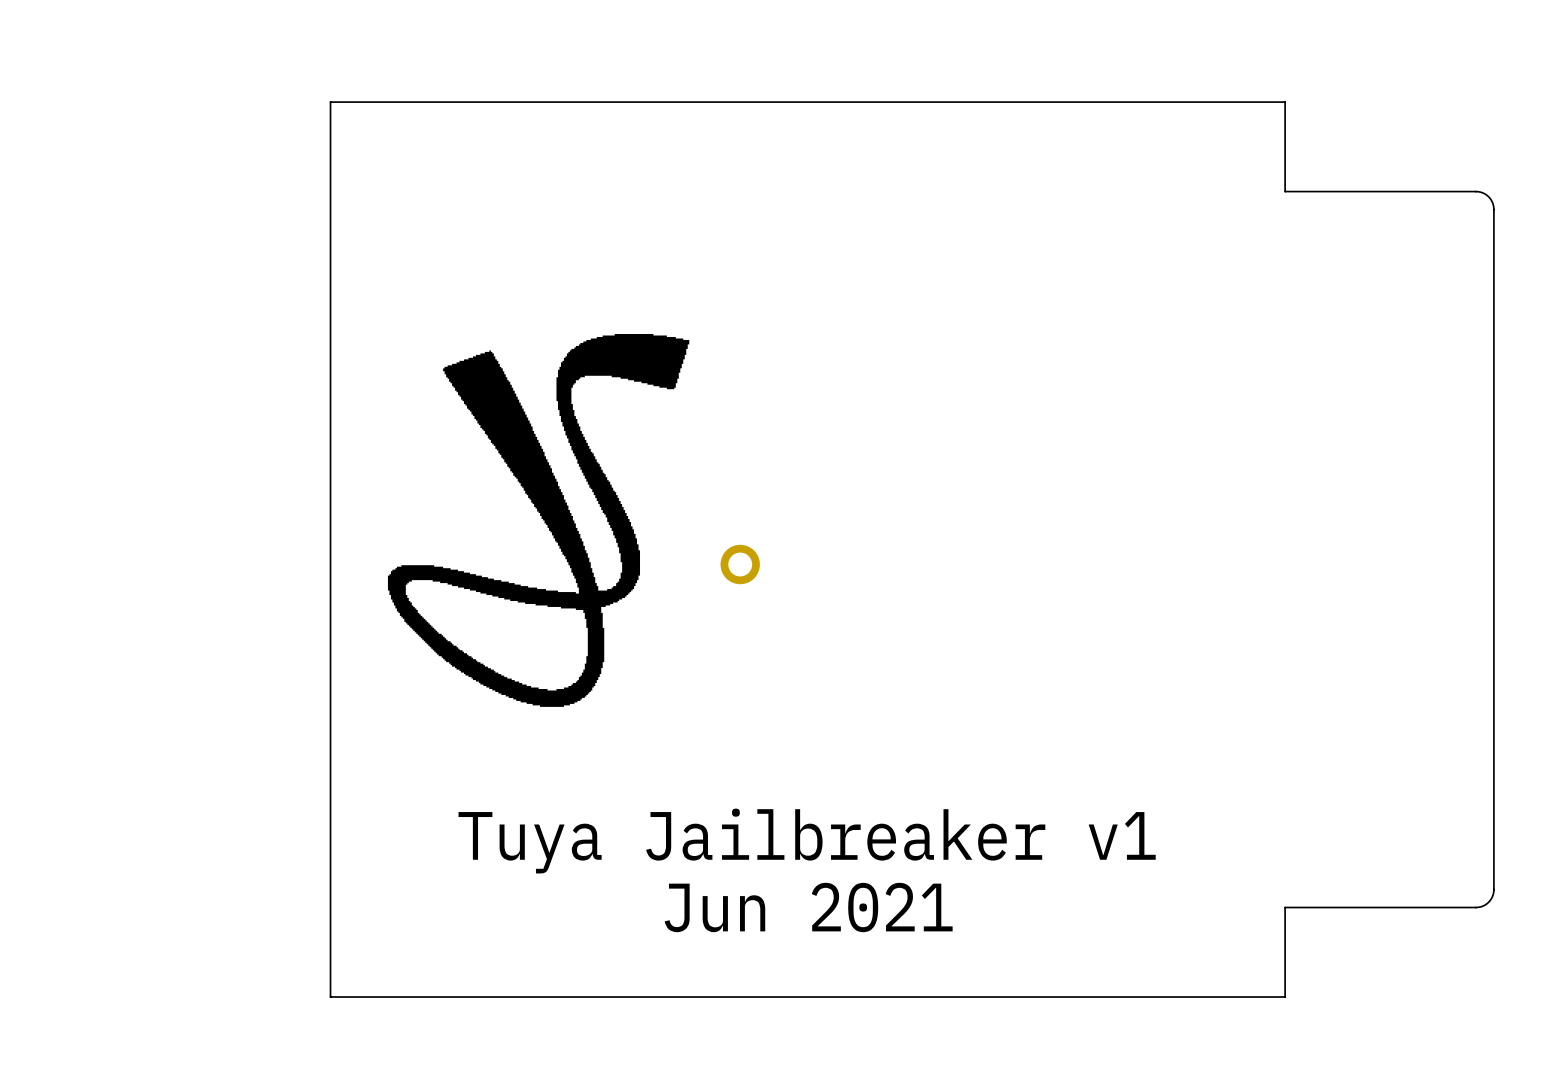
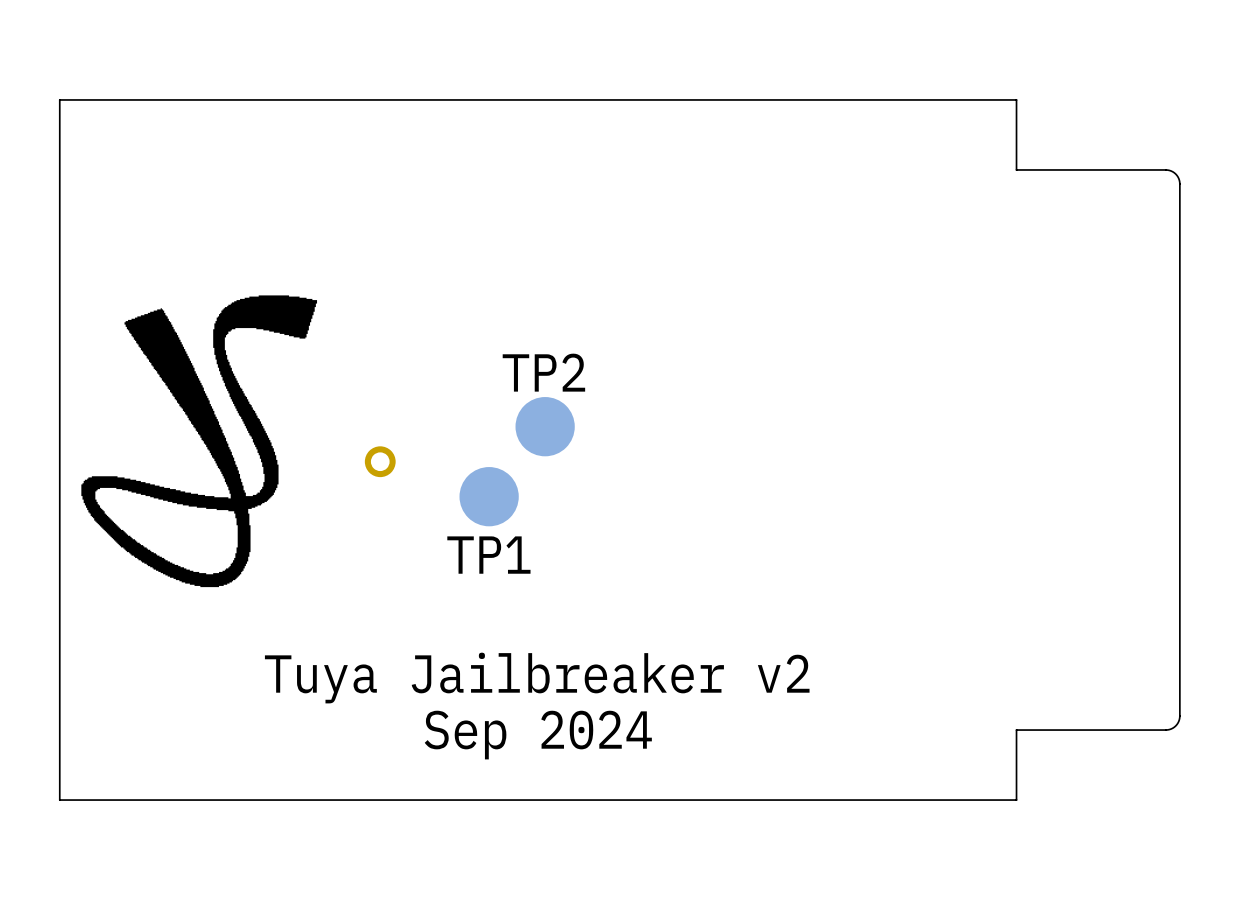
board edge: (330, 102) (330, 997) -> (269, 99) (59, 99) (59, 800) (269, 800)
TP2: none -> (545, 426)
drawing position: (538, 520) -> (199, 441)
part position: (740, 564) -> (380, 461)
TP1: none -> (489, 496)
text: Tuya Jailbreaker v1 (807, 841) -> Tuya Jailbreaker v2 (537, 678)
text: Jun 2021 (808, 907) -> none
text: none -> Sep 2024 (538, 735)

